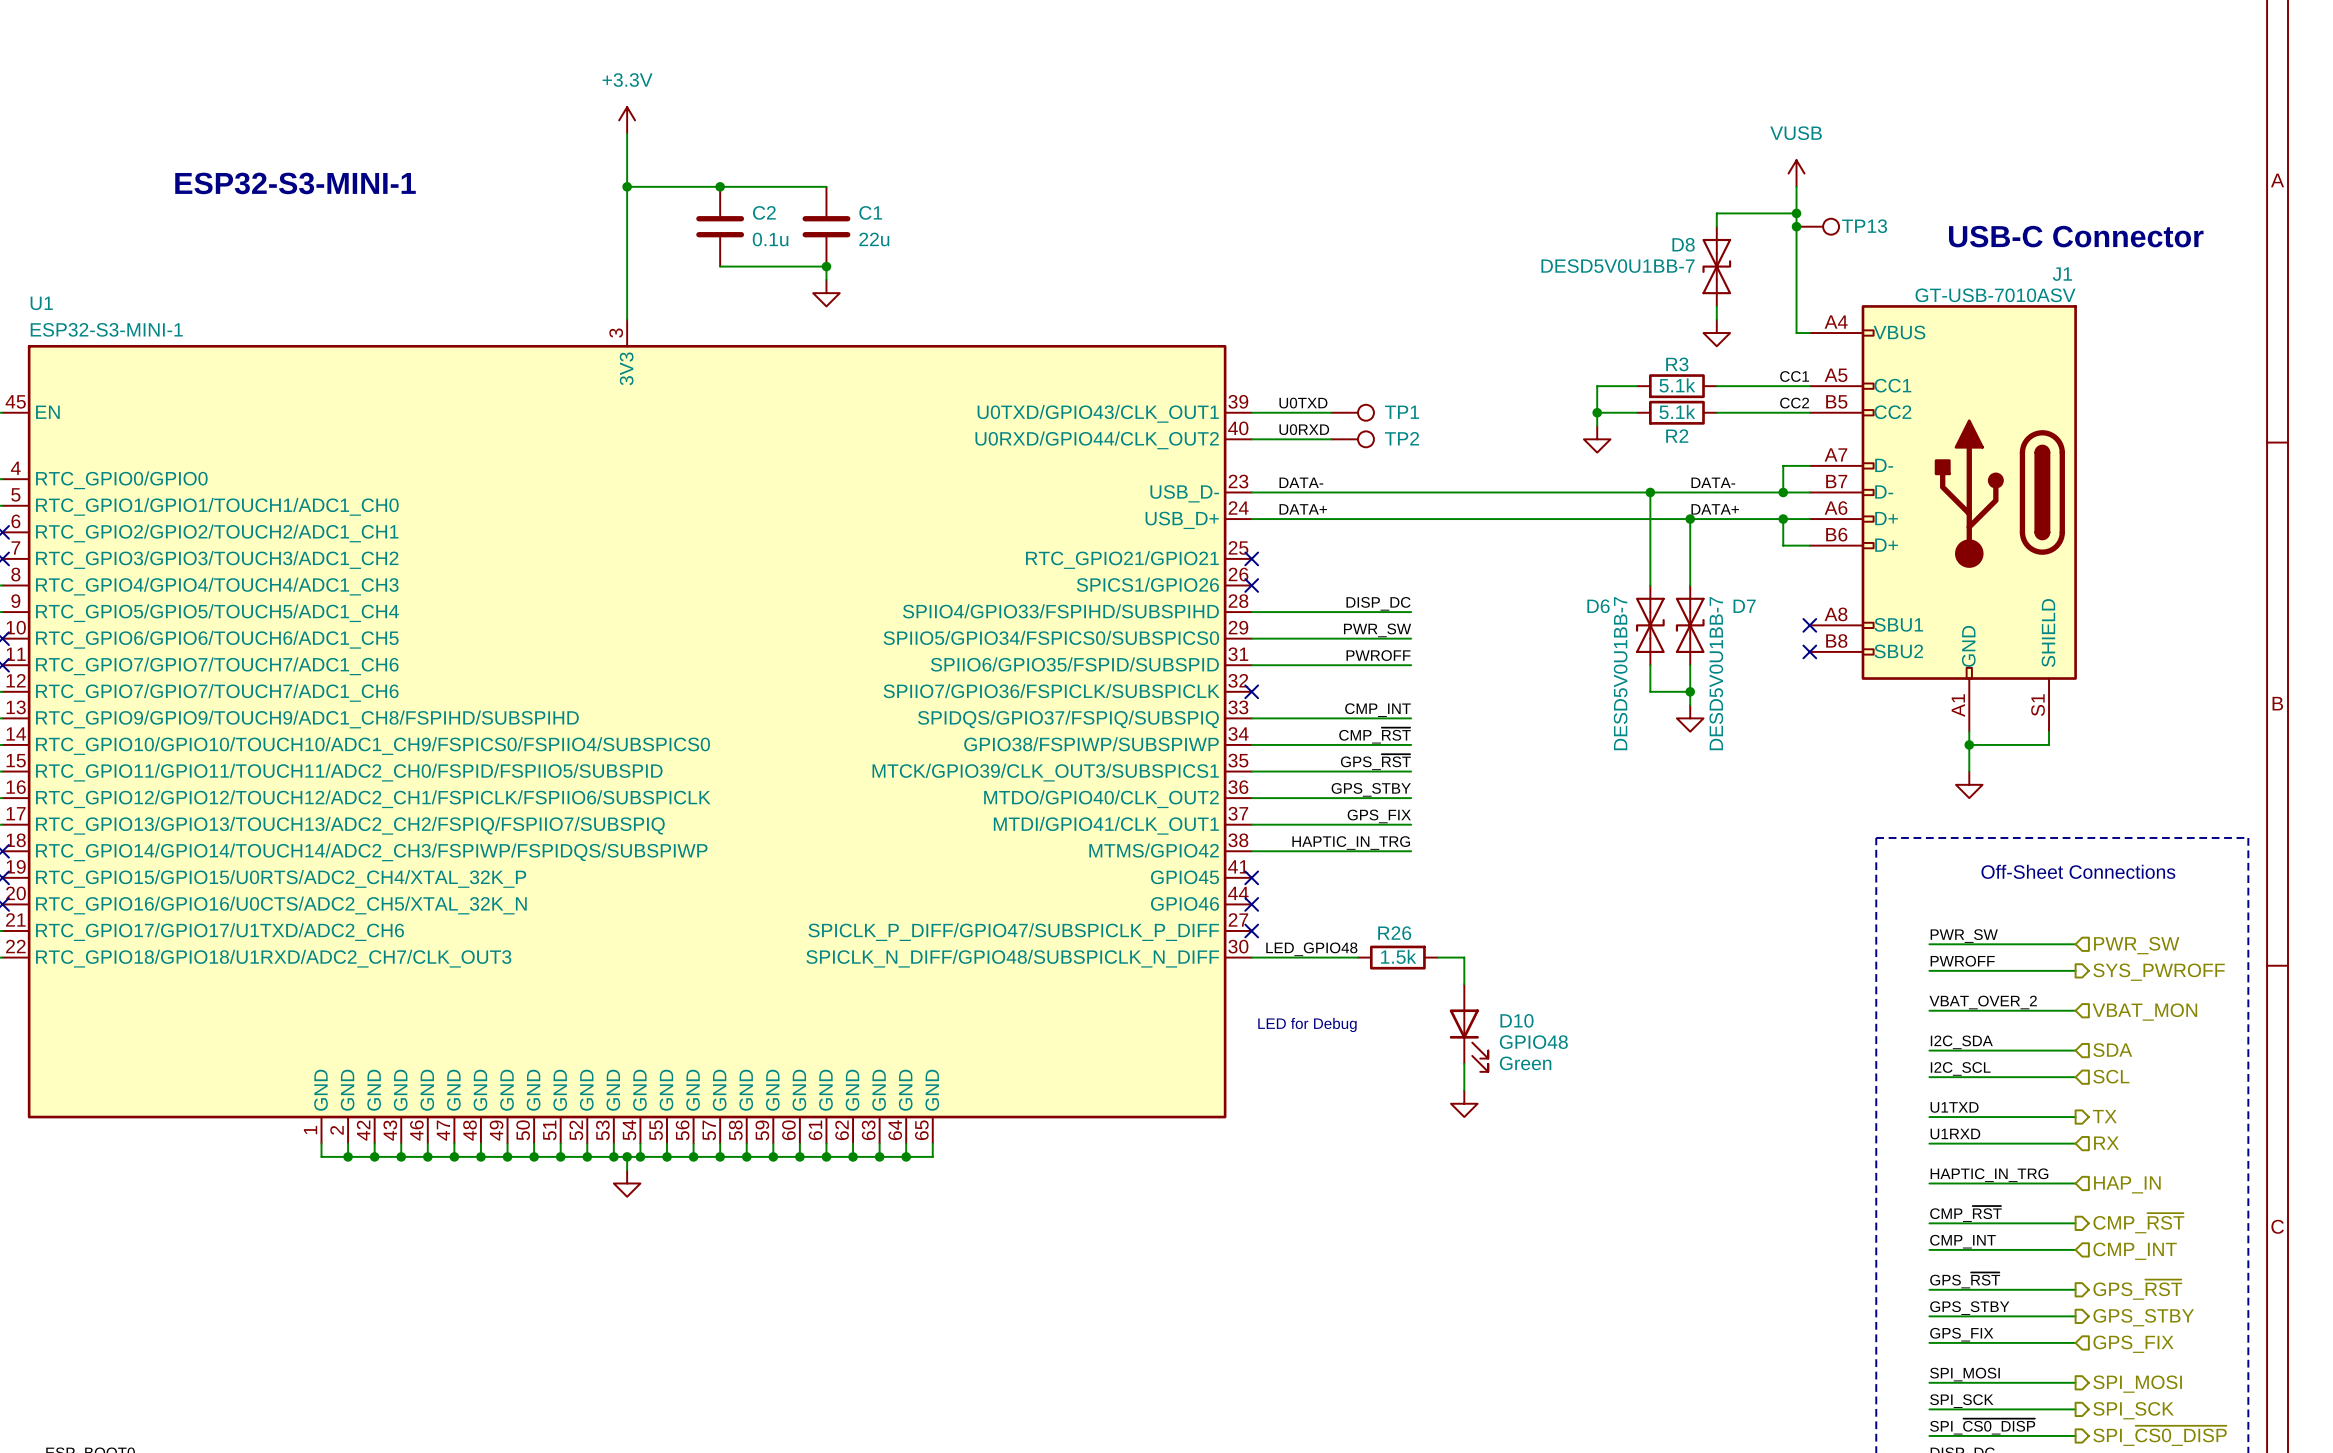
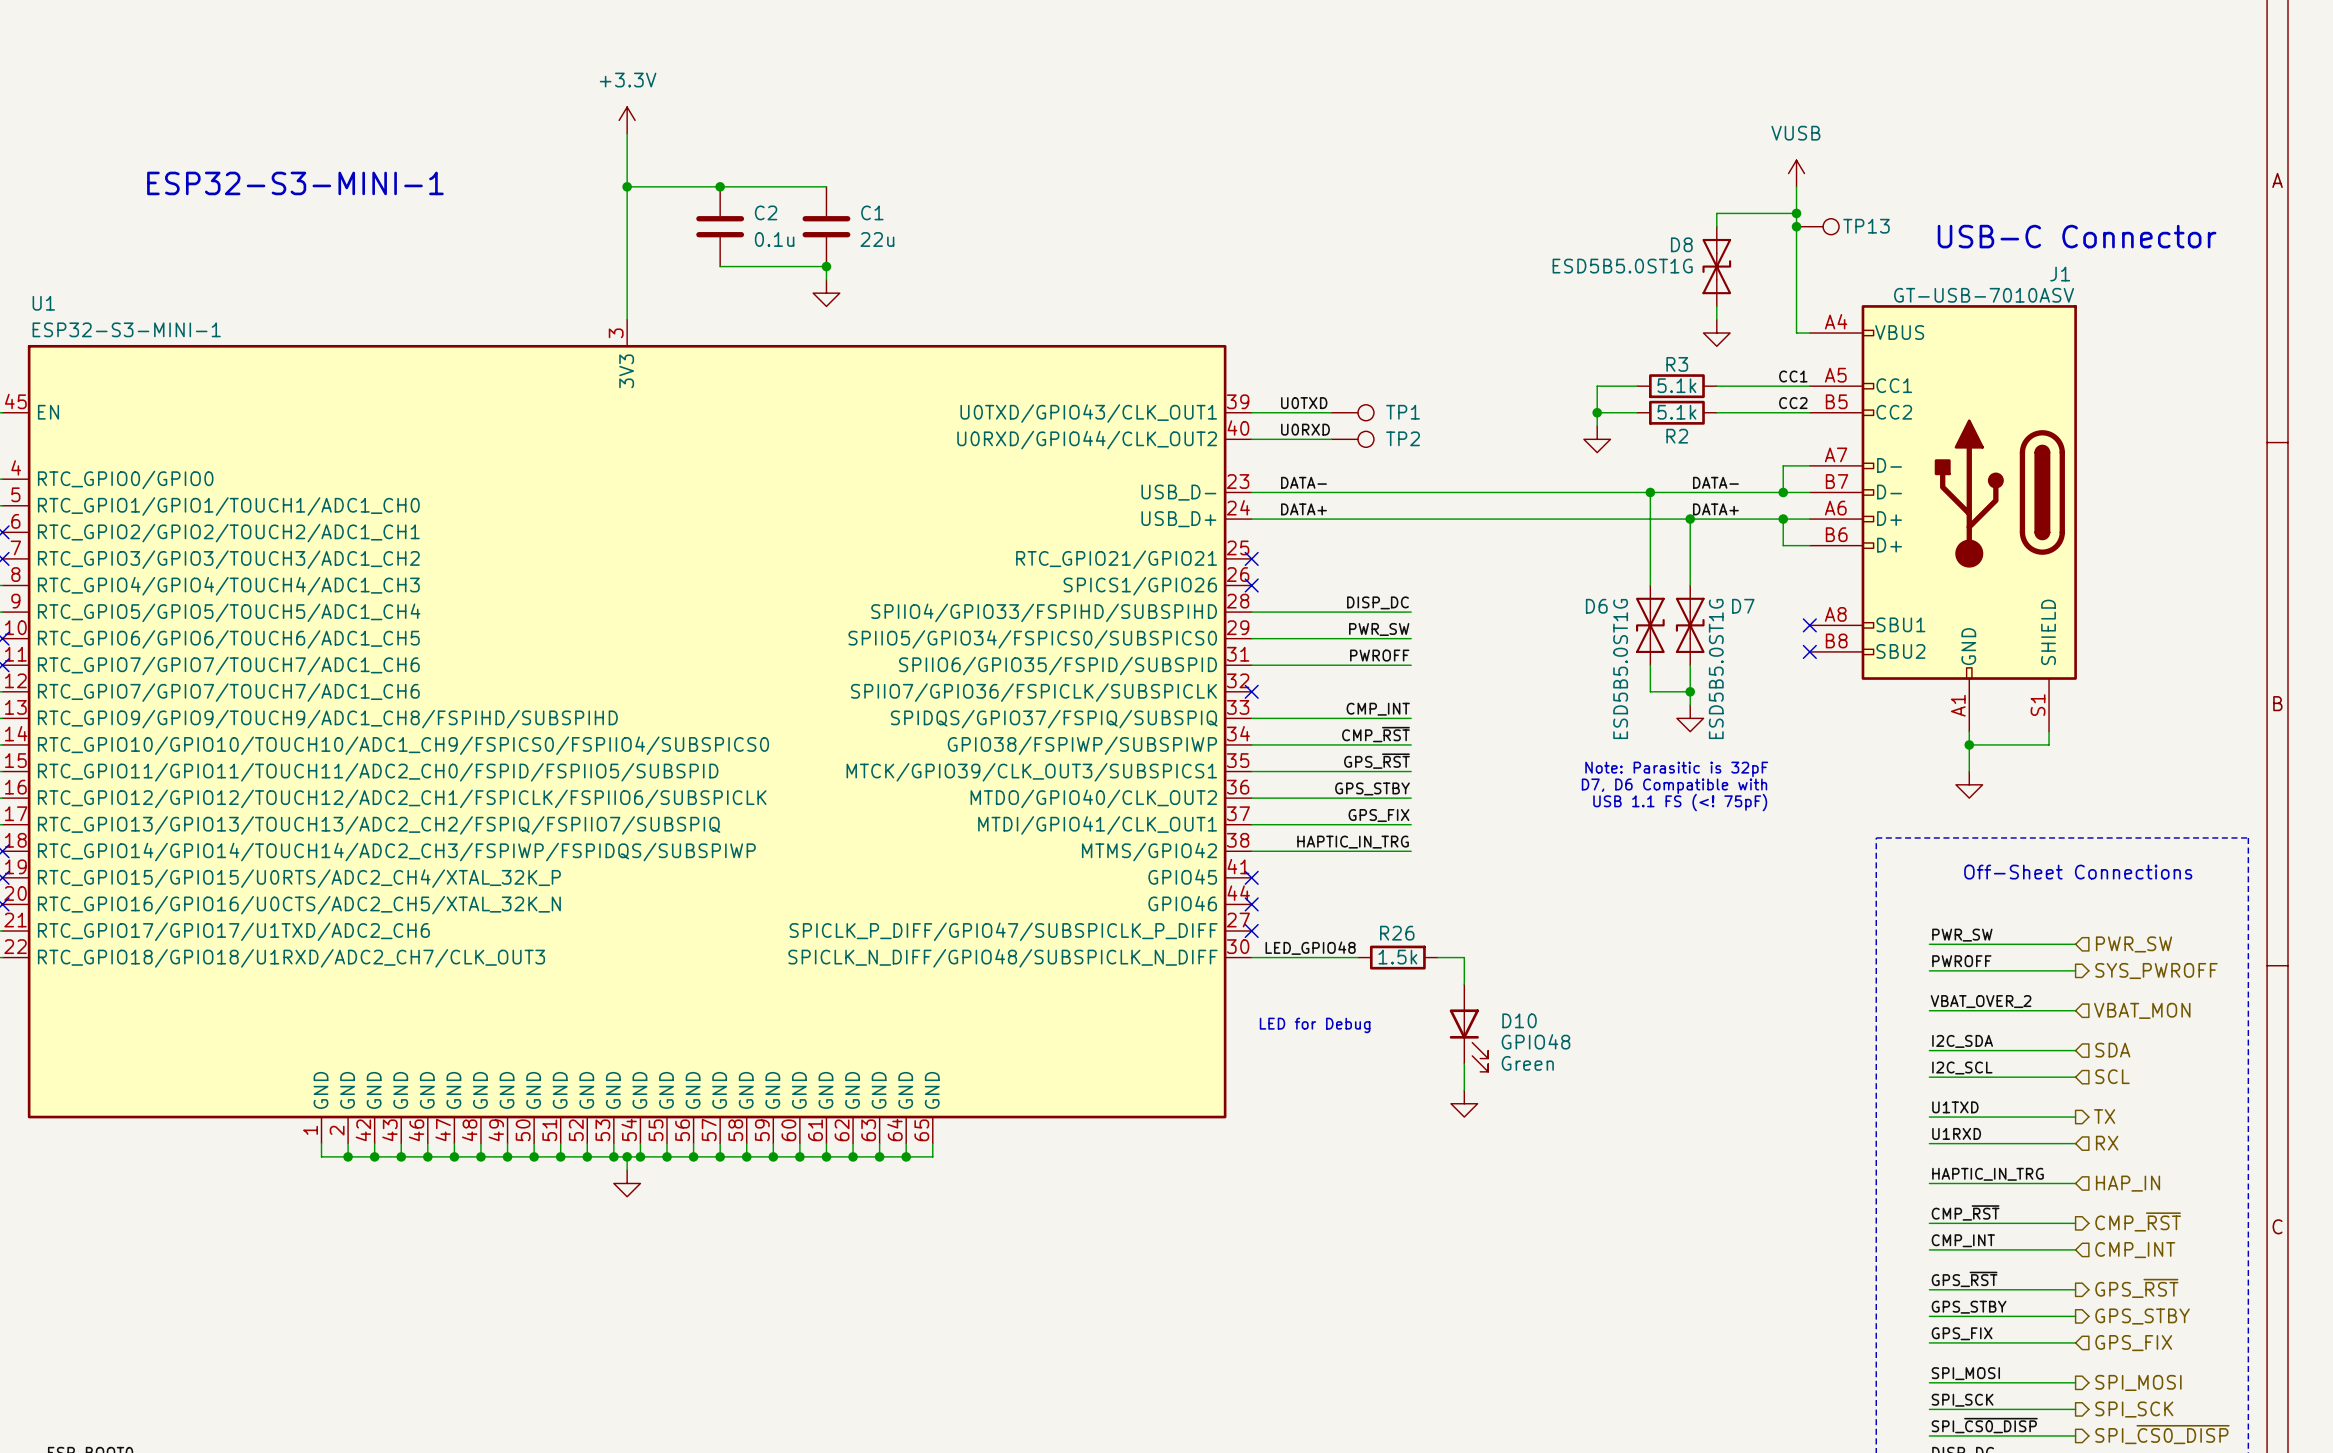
D8 value: DESD5V0U1BB-7 (1618, 266) -> ESD5B5.0ST1G (1622, 266)
D6 value: DESD5V0U1BB-7 (1620, 673) -> ESD5B5.0ST1G (1620, 669)
D7 value: DESD5V0U1BB-7 (1716, 673) -> ESD5B5.0ST1G (1716, 669)
text: none -> Note: Parasitic is 32pF (1676, 769)
text: none -> D7, D6 Compatible with (1674, 786)
text: none -> USB 1.1 FS (<! 75pF) (1680, 802)

